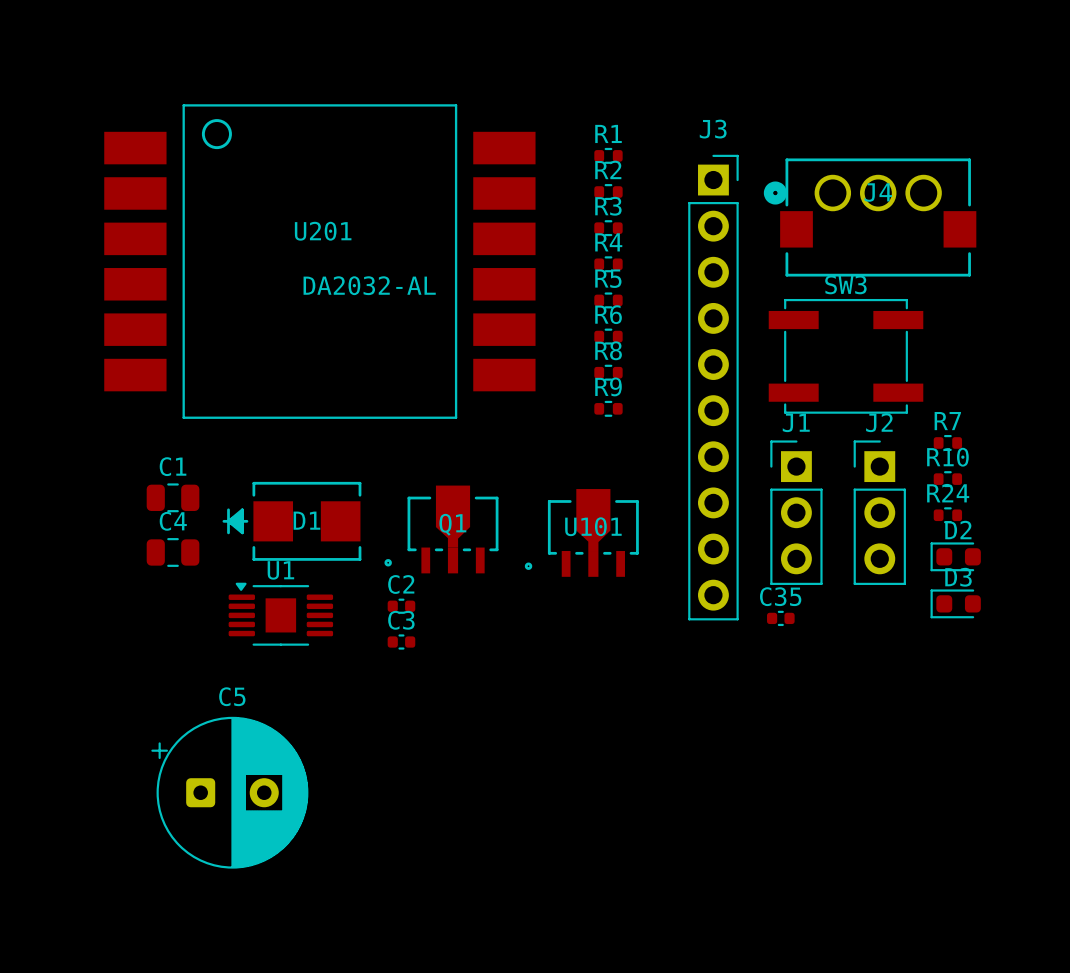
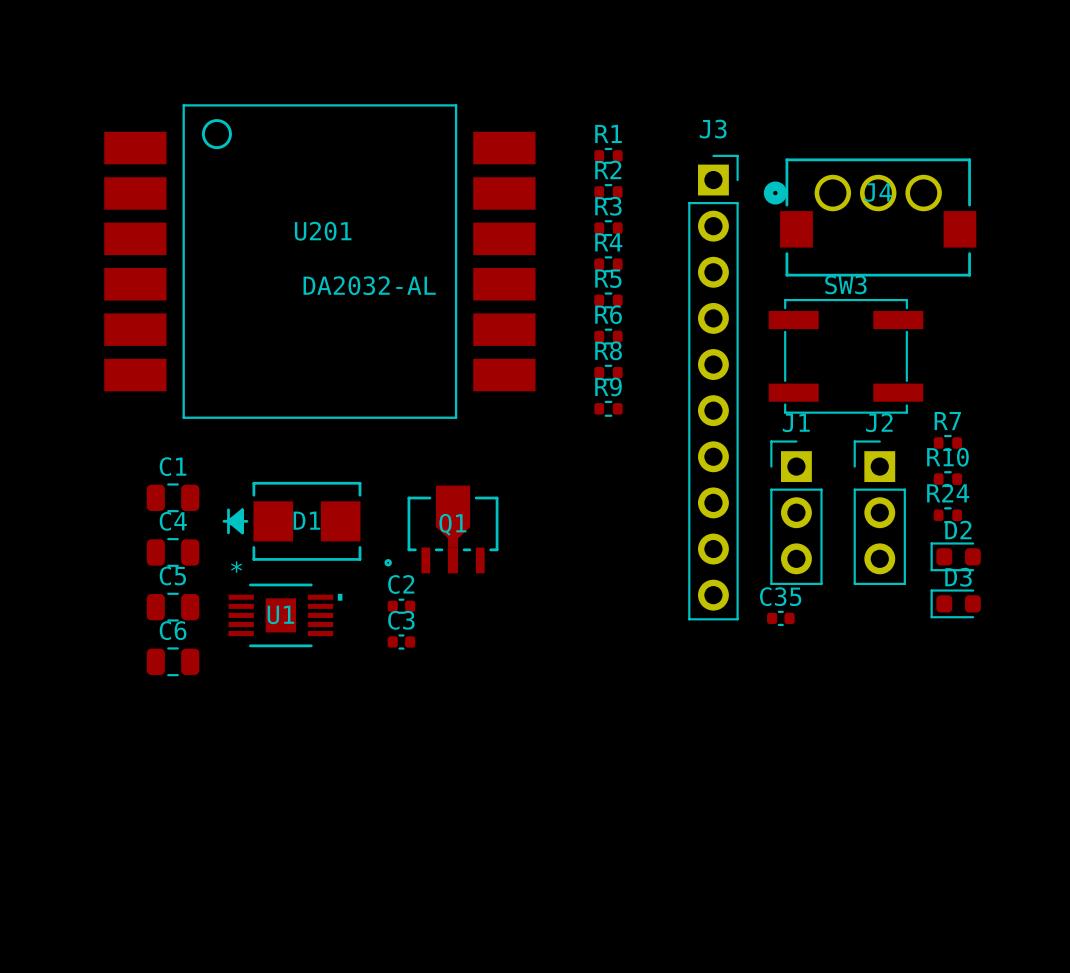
U101: (581, 532) -> none
U1 name position: U1 (280, 570) -> U1 (280, 614)
U1 footprint: [228, 582, 334, 646] -> [228, 583, 343, 648]
C6: none -> (173, 661)
C5 name position: C5 (232, 696) -> C5 (172, 575)
C5 footprint: [151, 716, 309, 869] -> [146, 592, 200, 622]

